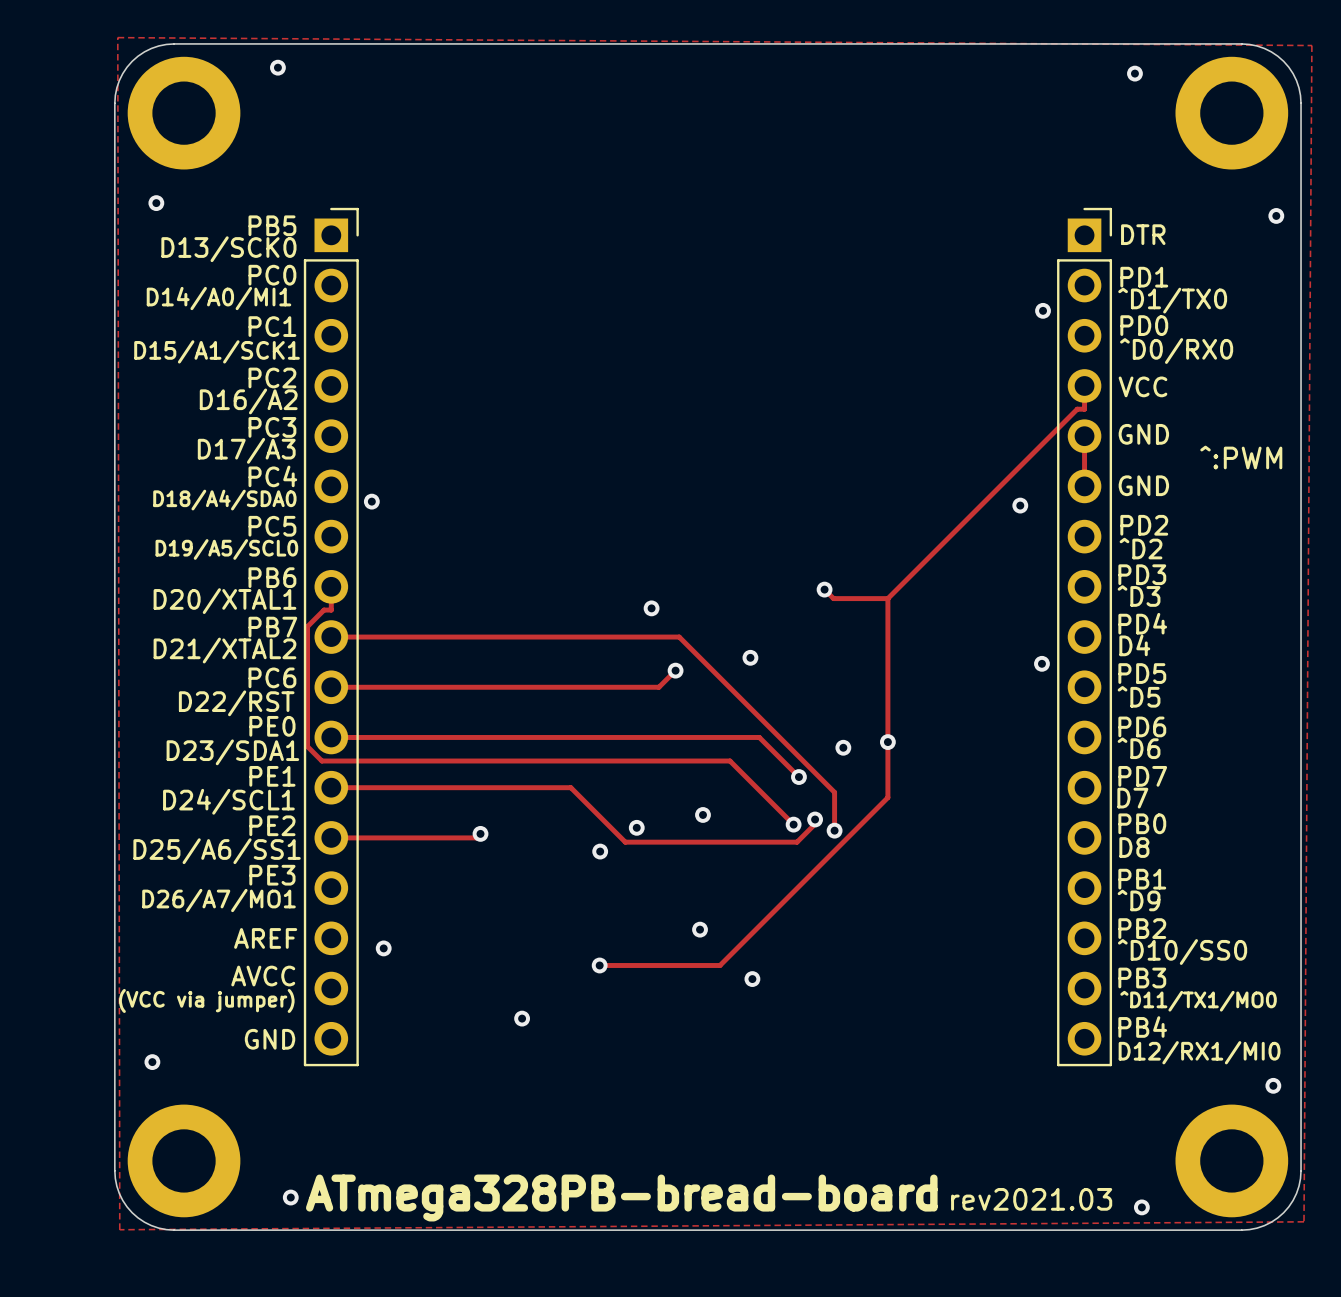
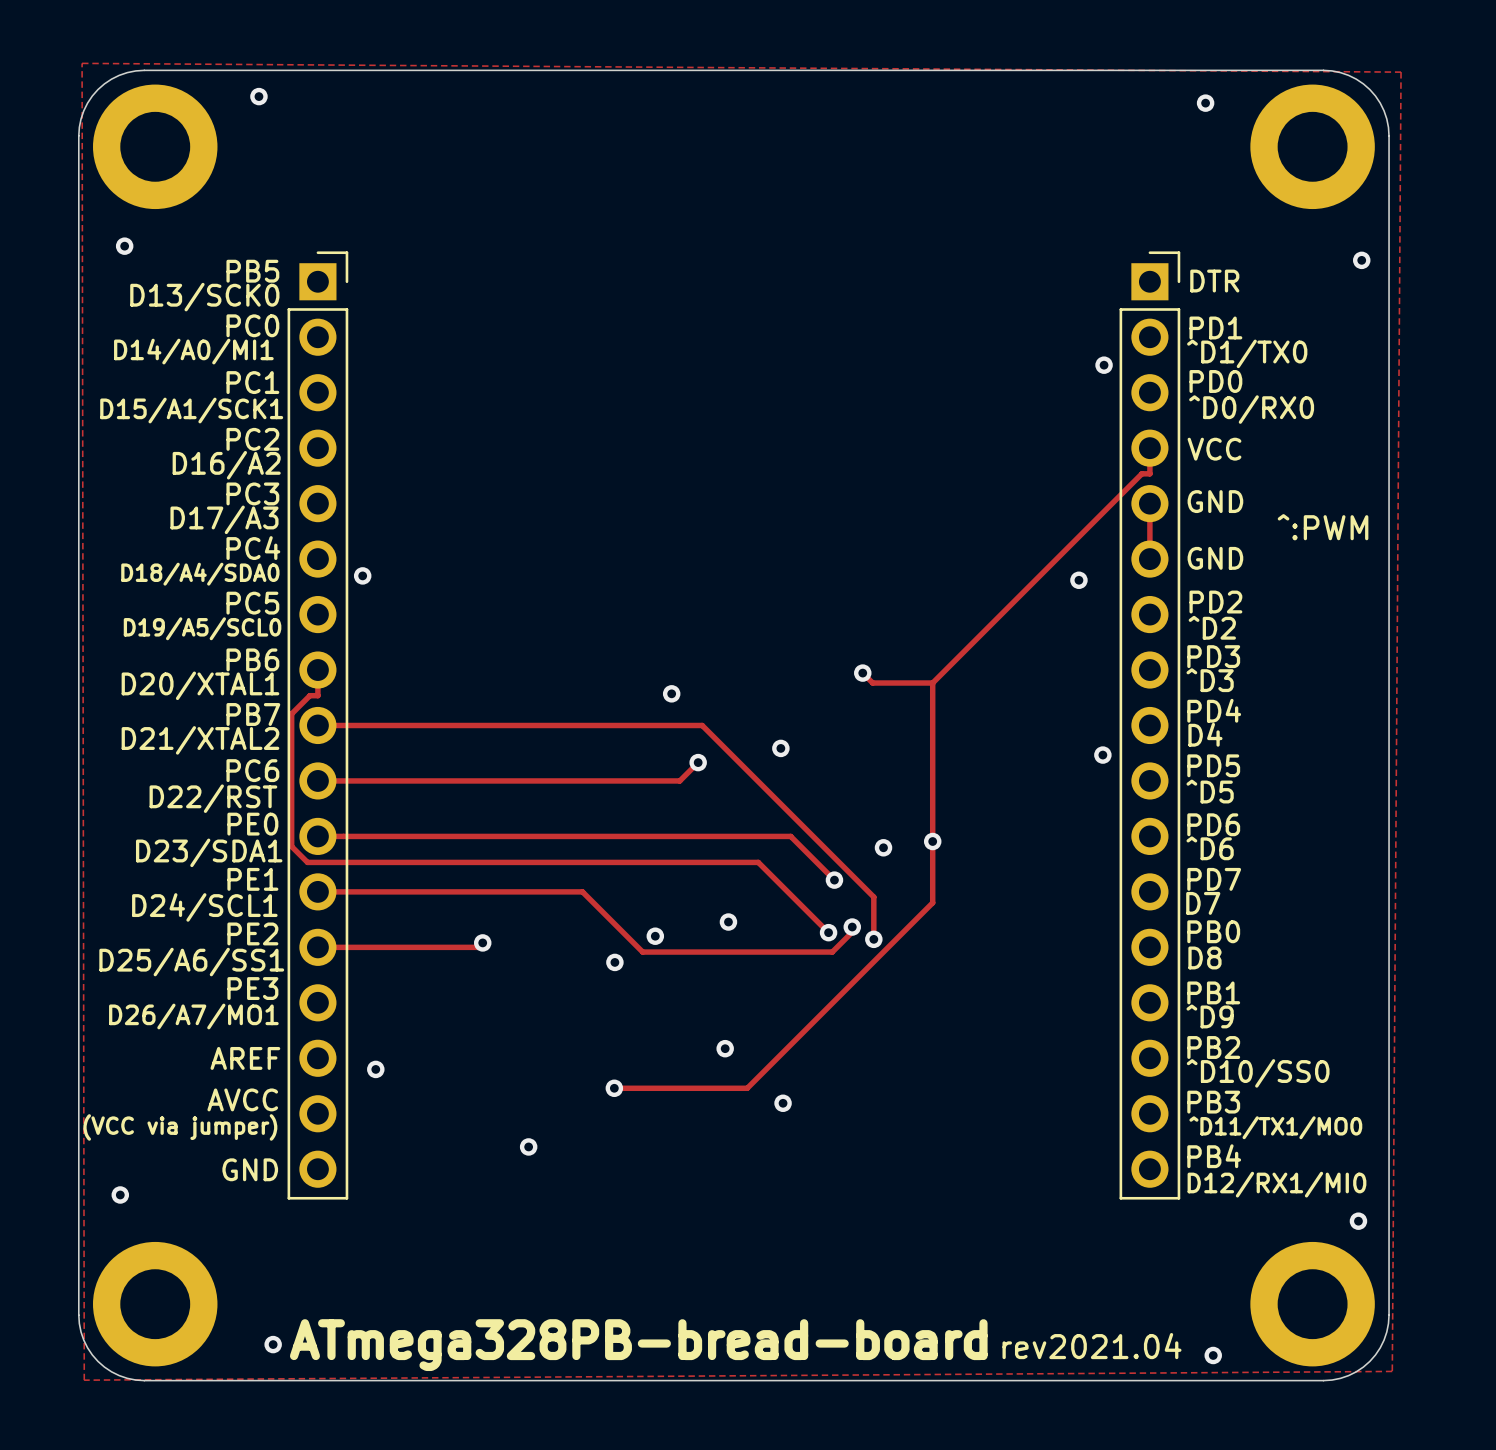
text: rev2021.03 (1031, 1199) -> rev2021.04 (1091, 1346)

